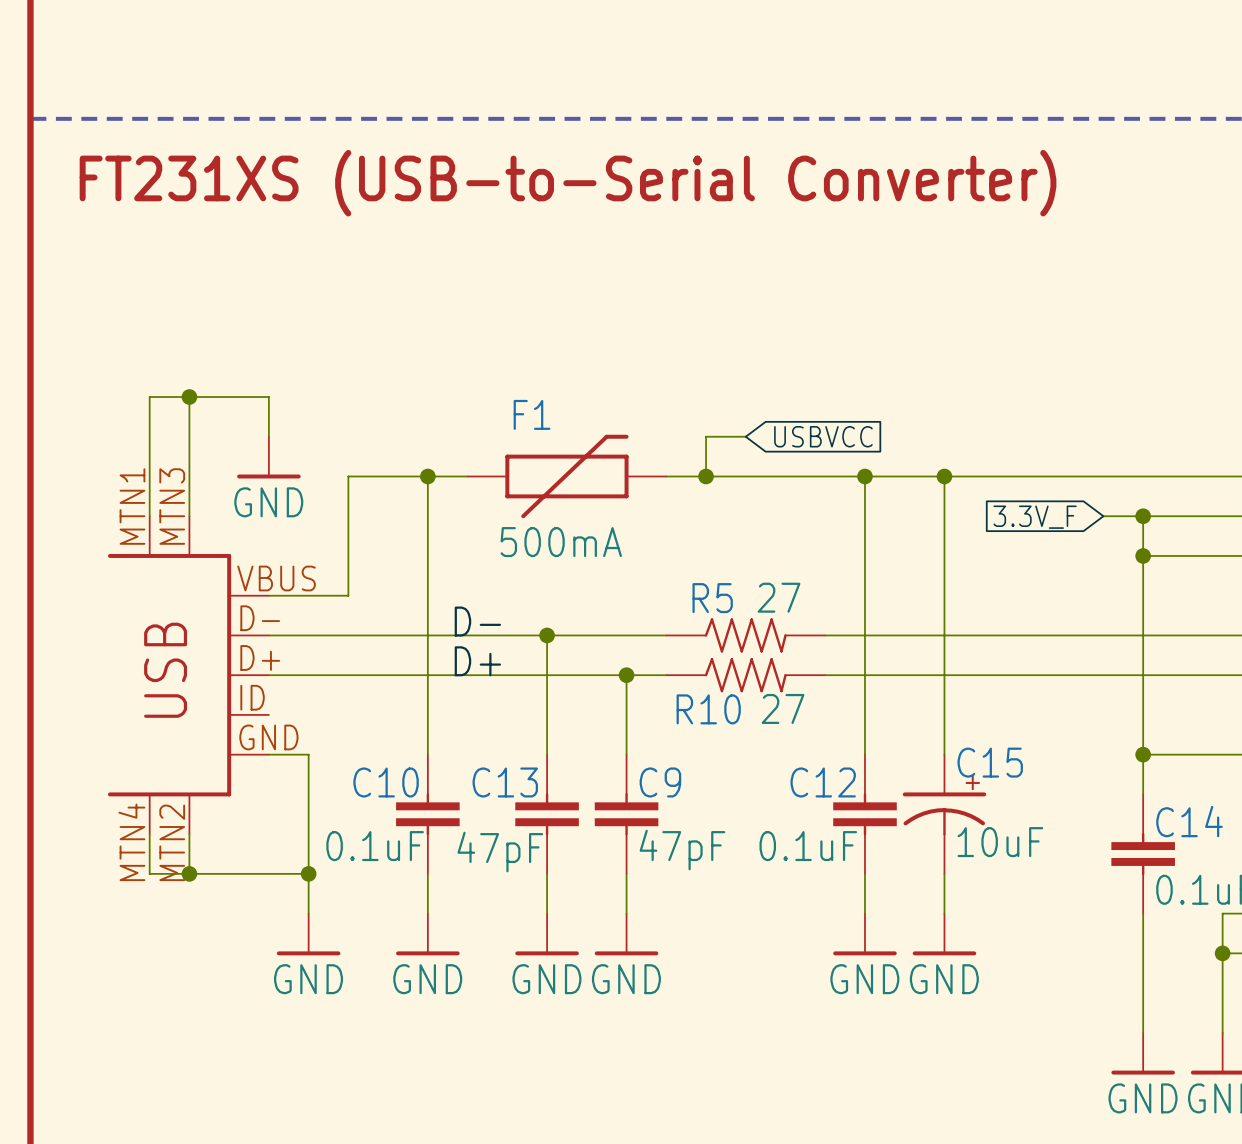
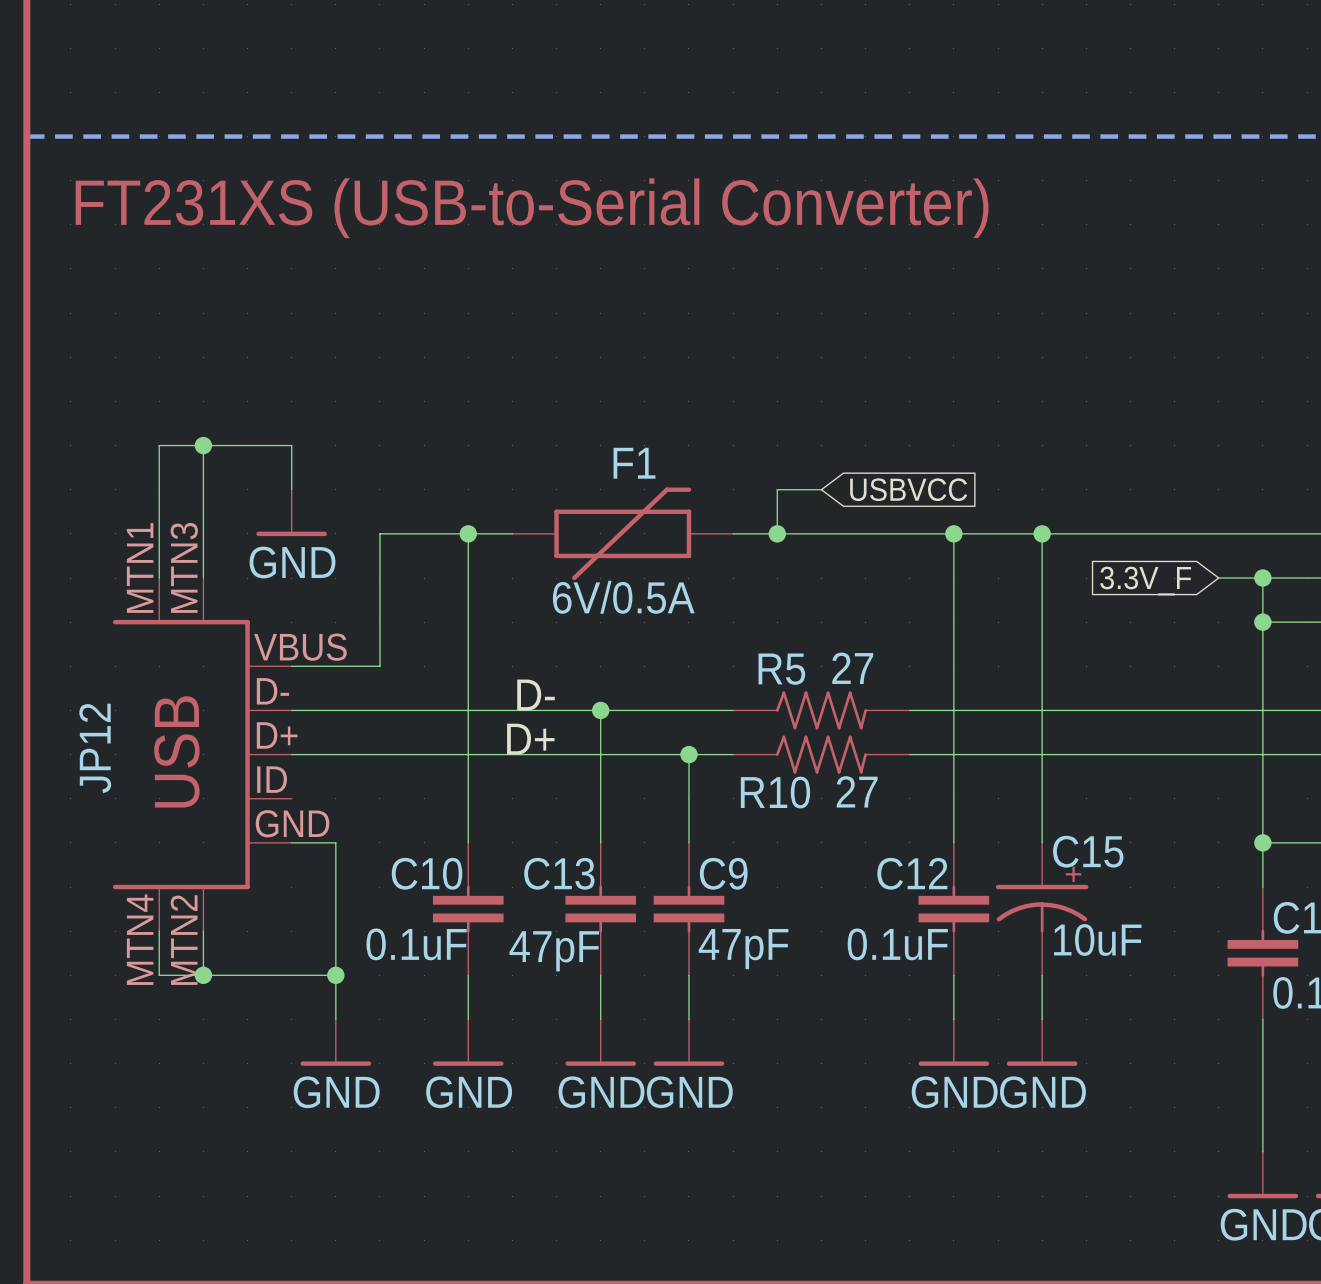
F1 name position: F1 (532, 414) -> F1 (634, 463)
F1 value: 500mA (561, 542) -> 6V/0.5A (623, 597)
JP12 name: none -> JP12 (95, 748)

